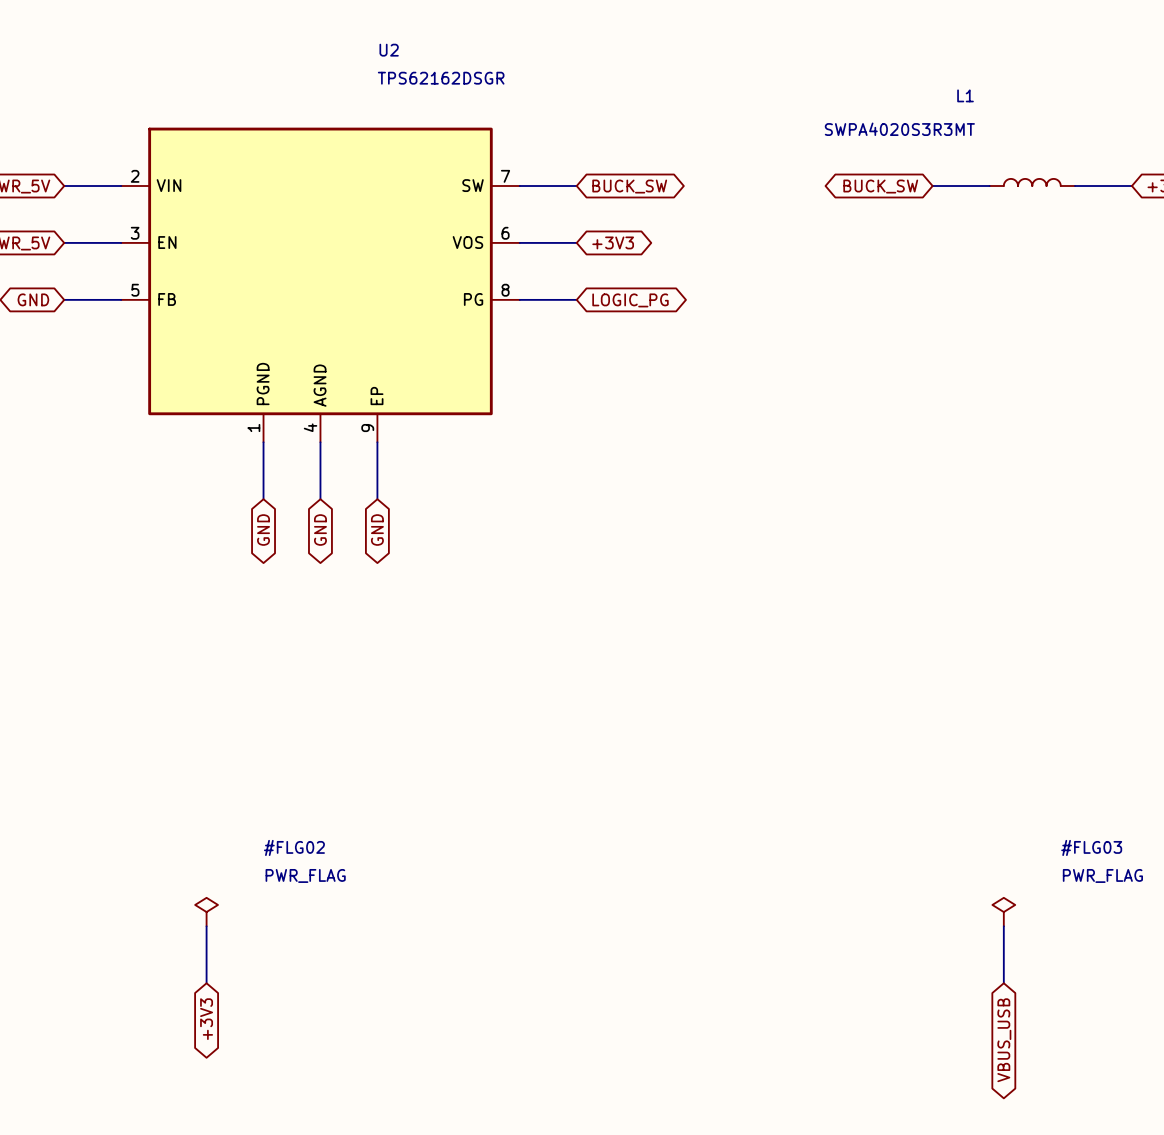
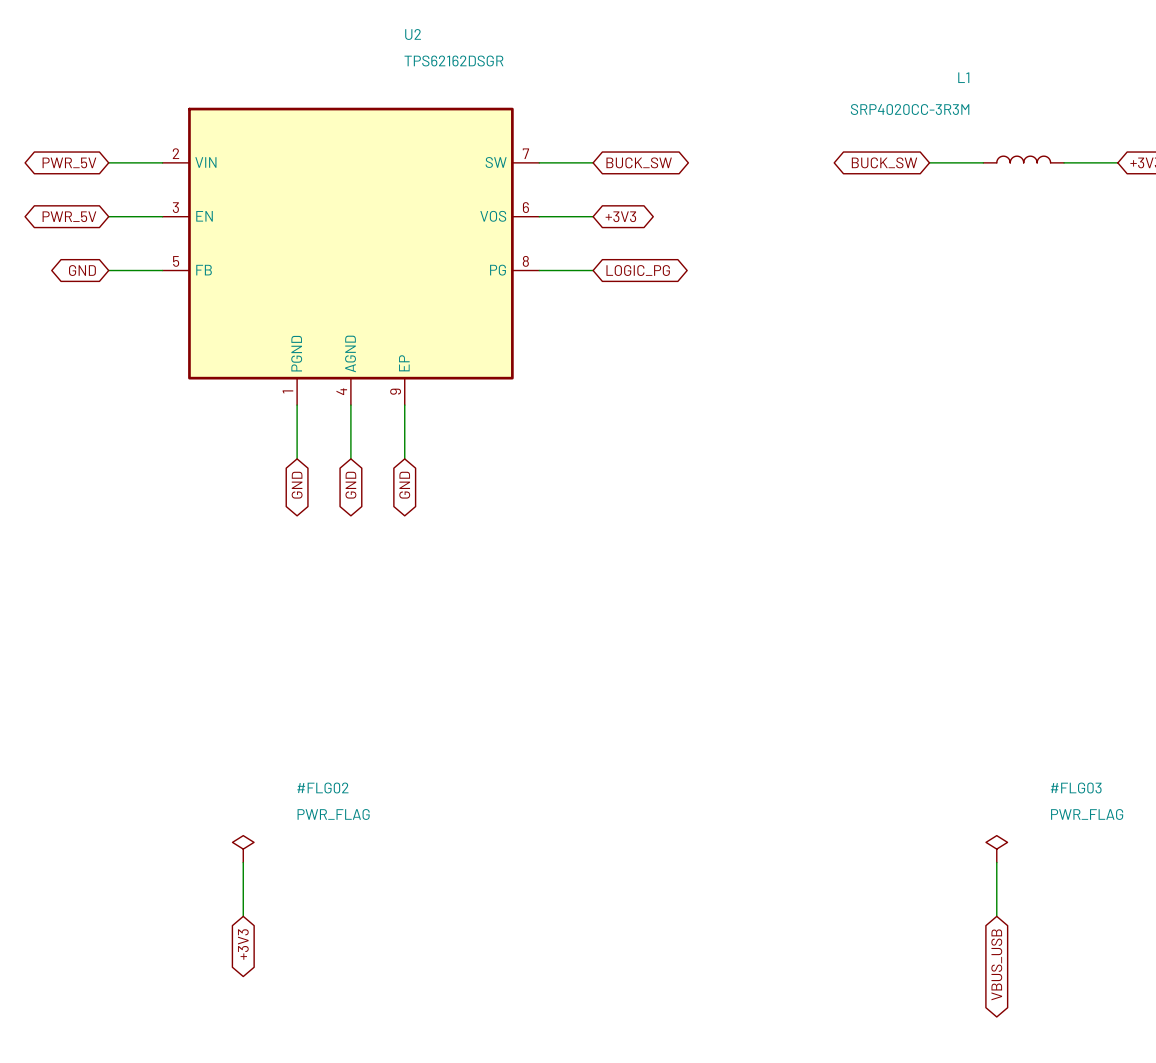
L1 value: SWPA4020S3R3MT (899, 129) -> SRP4020CC-3R3M (910, 109)

